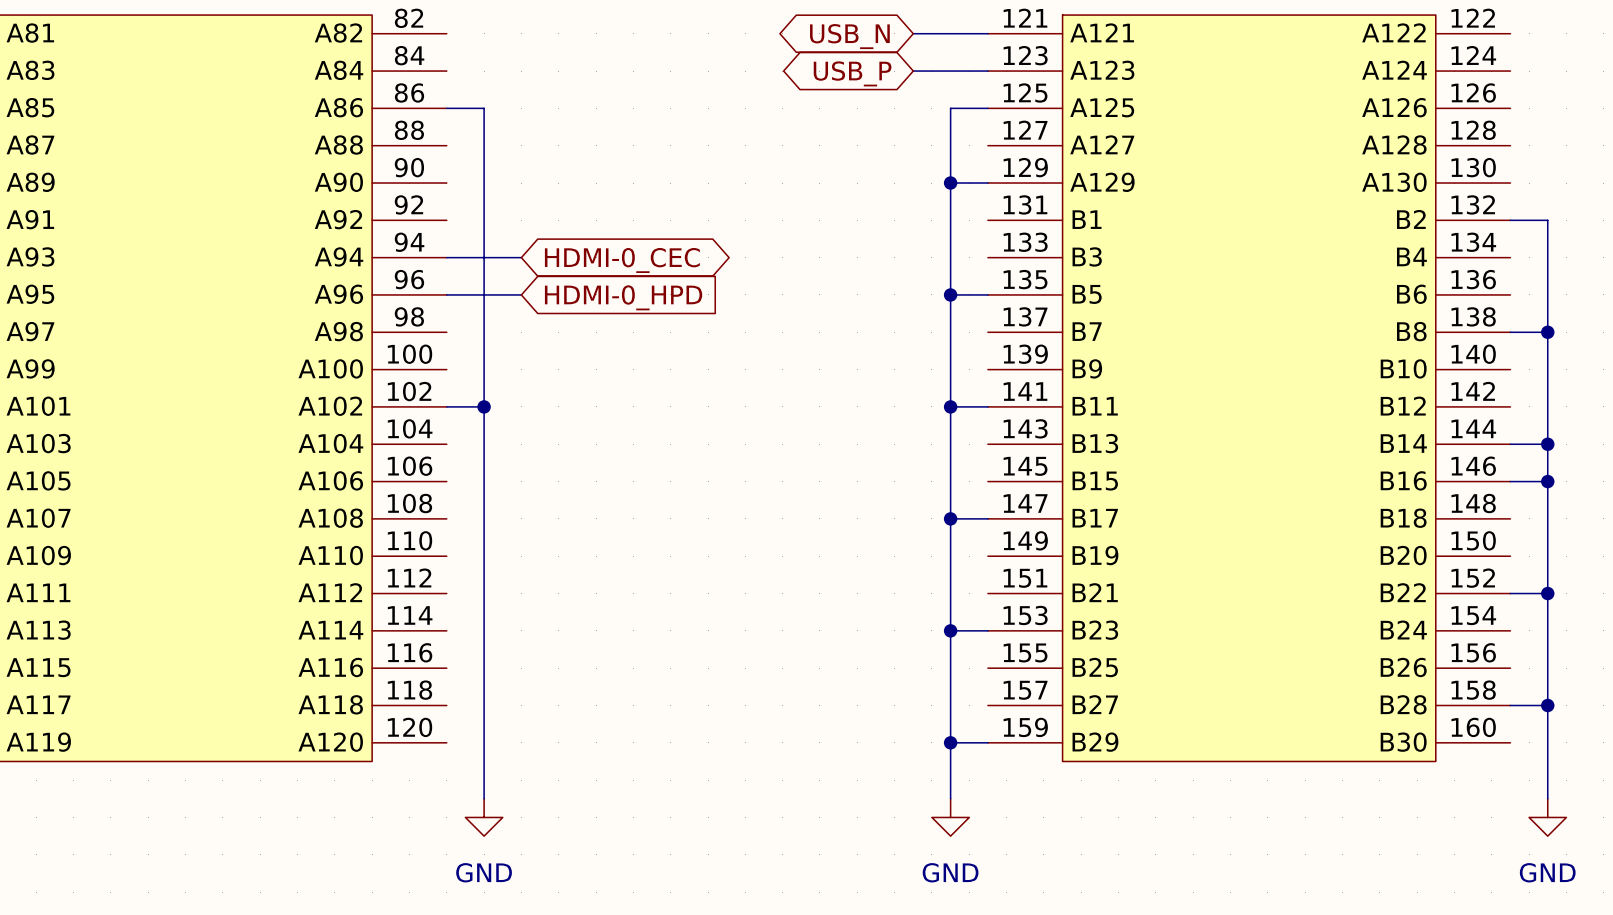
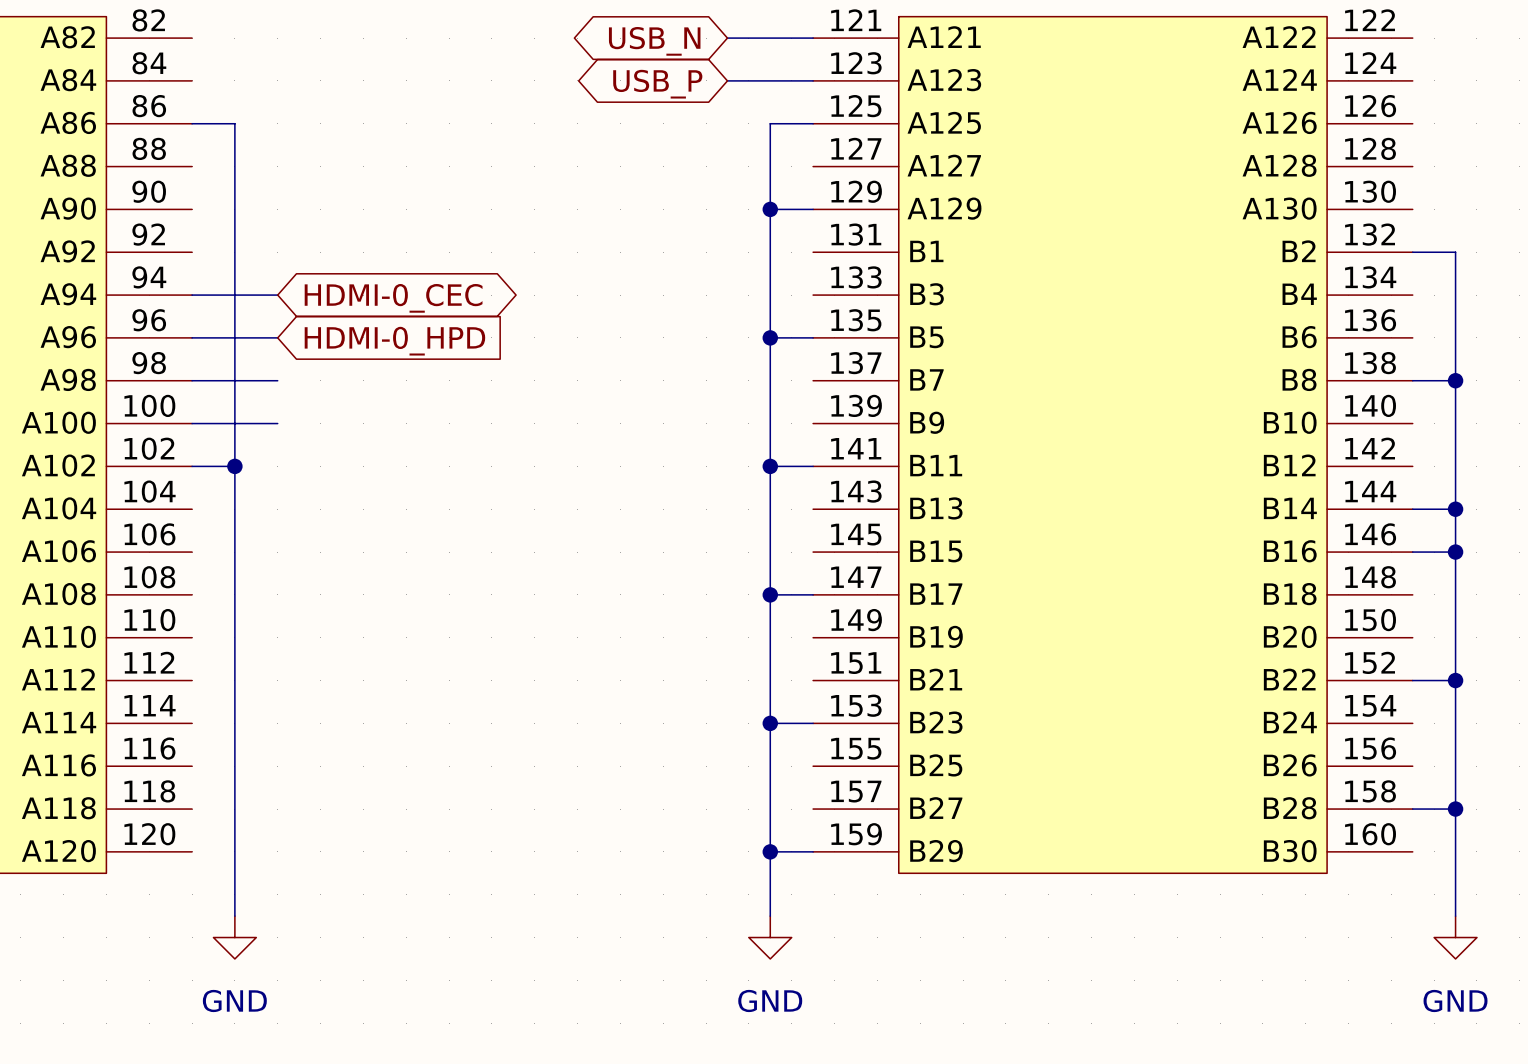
wire: none -> (192, 380) (277, 380)
wire: none -> (192, 423) (277, 423)

